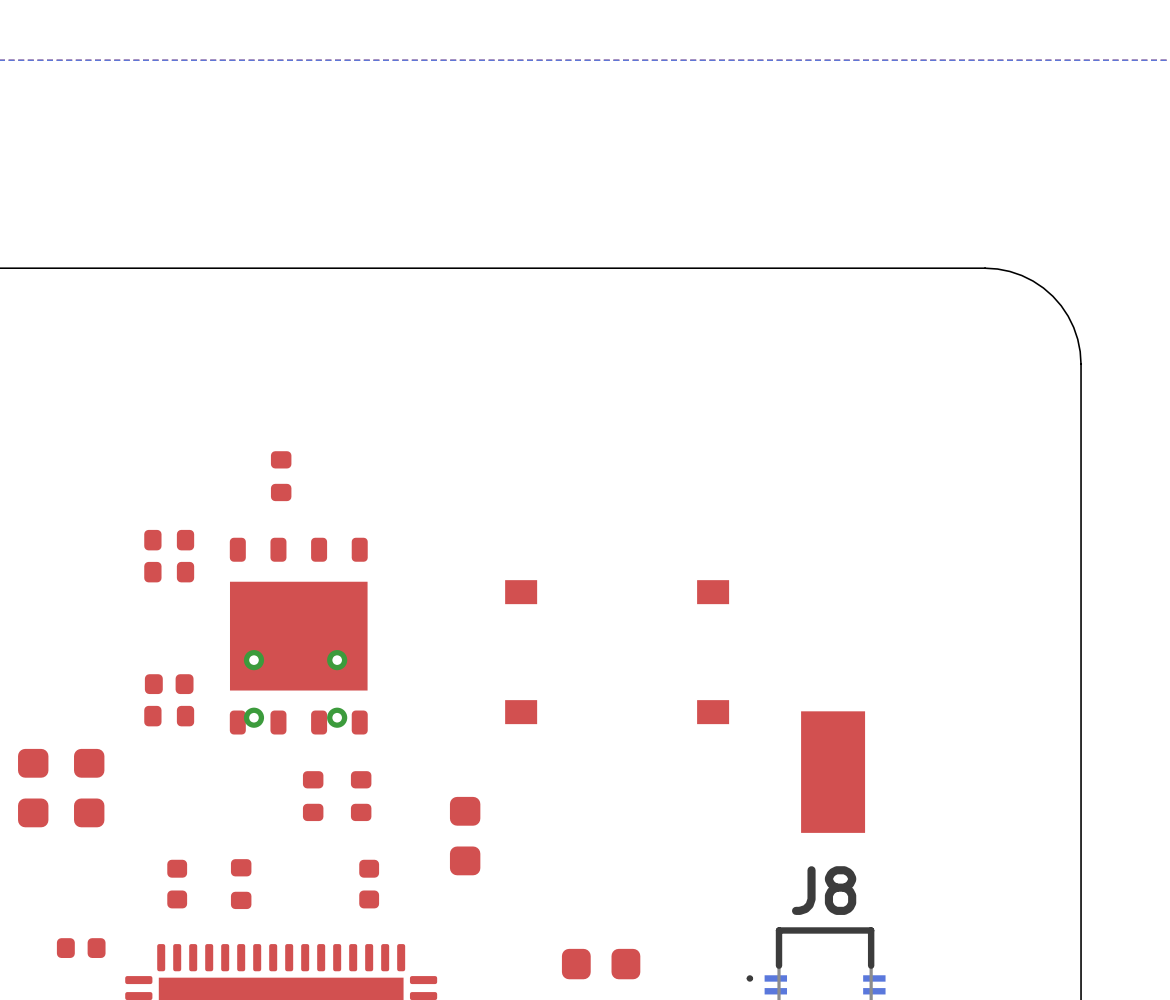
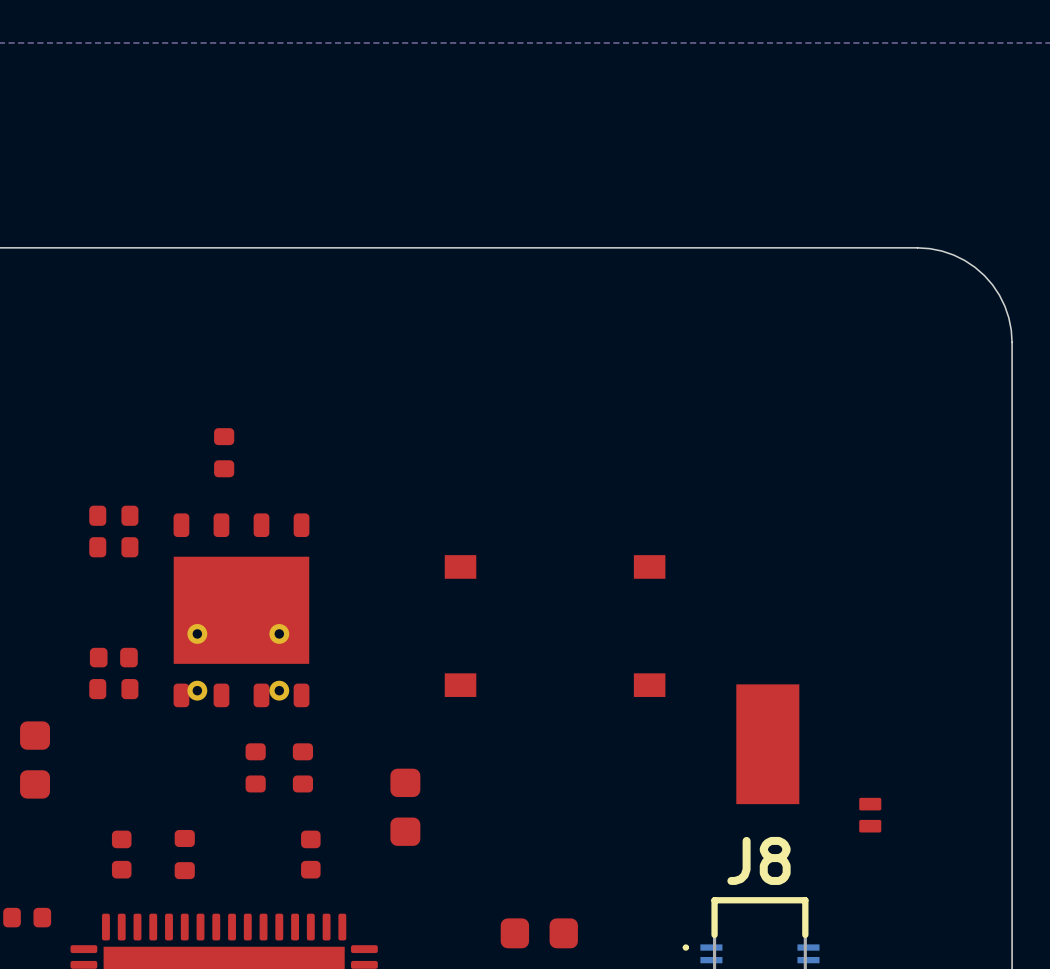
part: none -> (870, 815)

